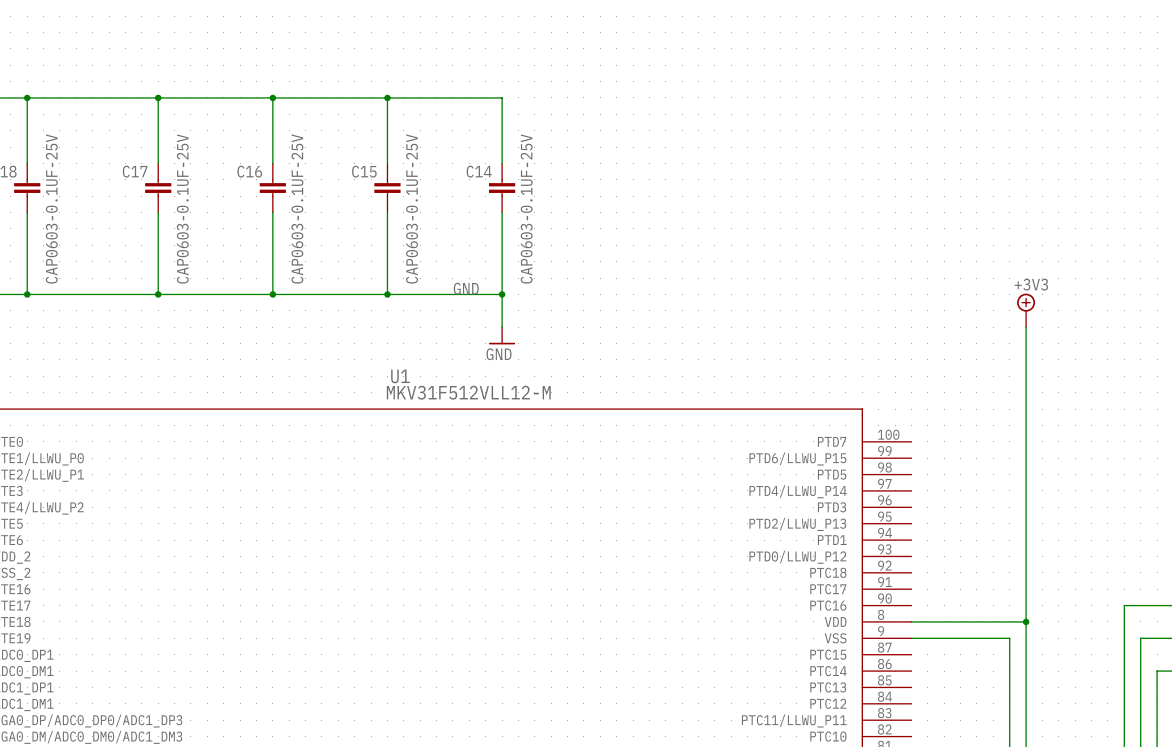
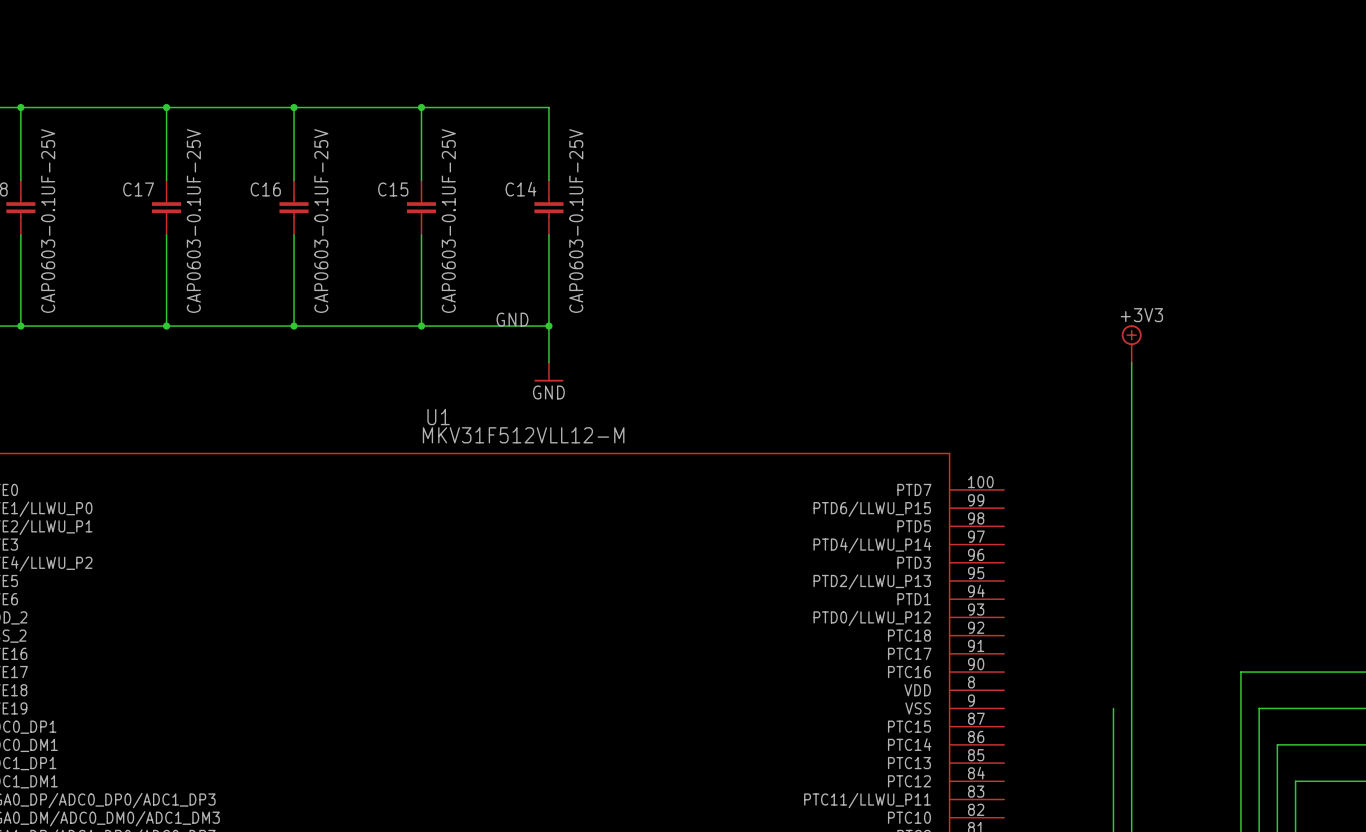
wire: (911, 621) (1026, 621) -> none
junction: (1026, 621) -> none
wire: (911, 638) (1009, 638) -> none

